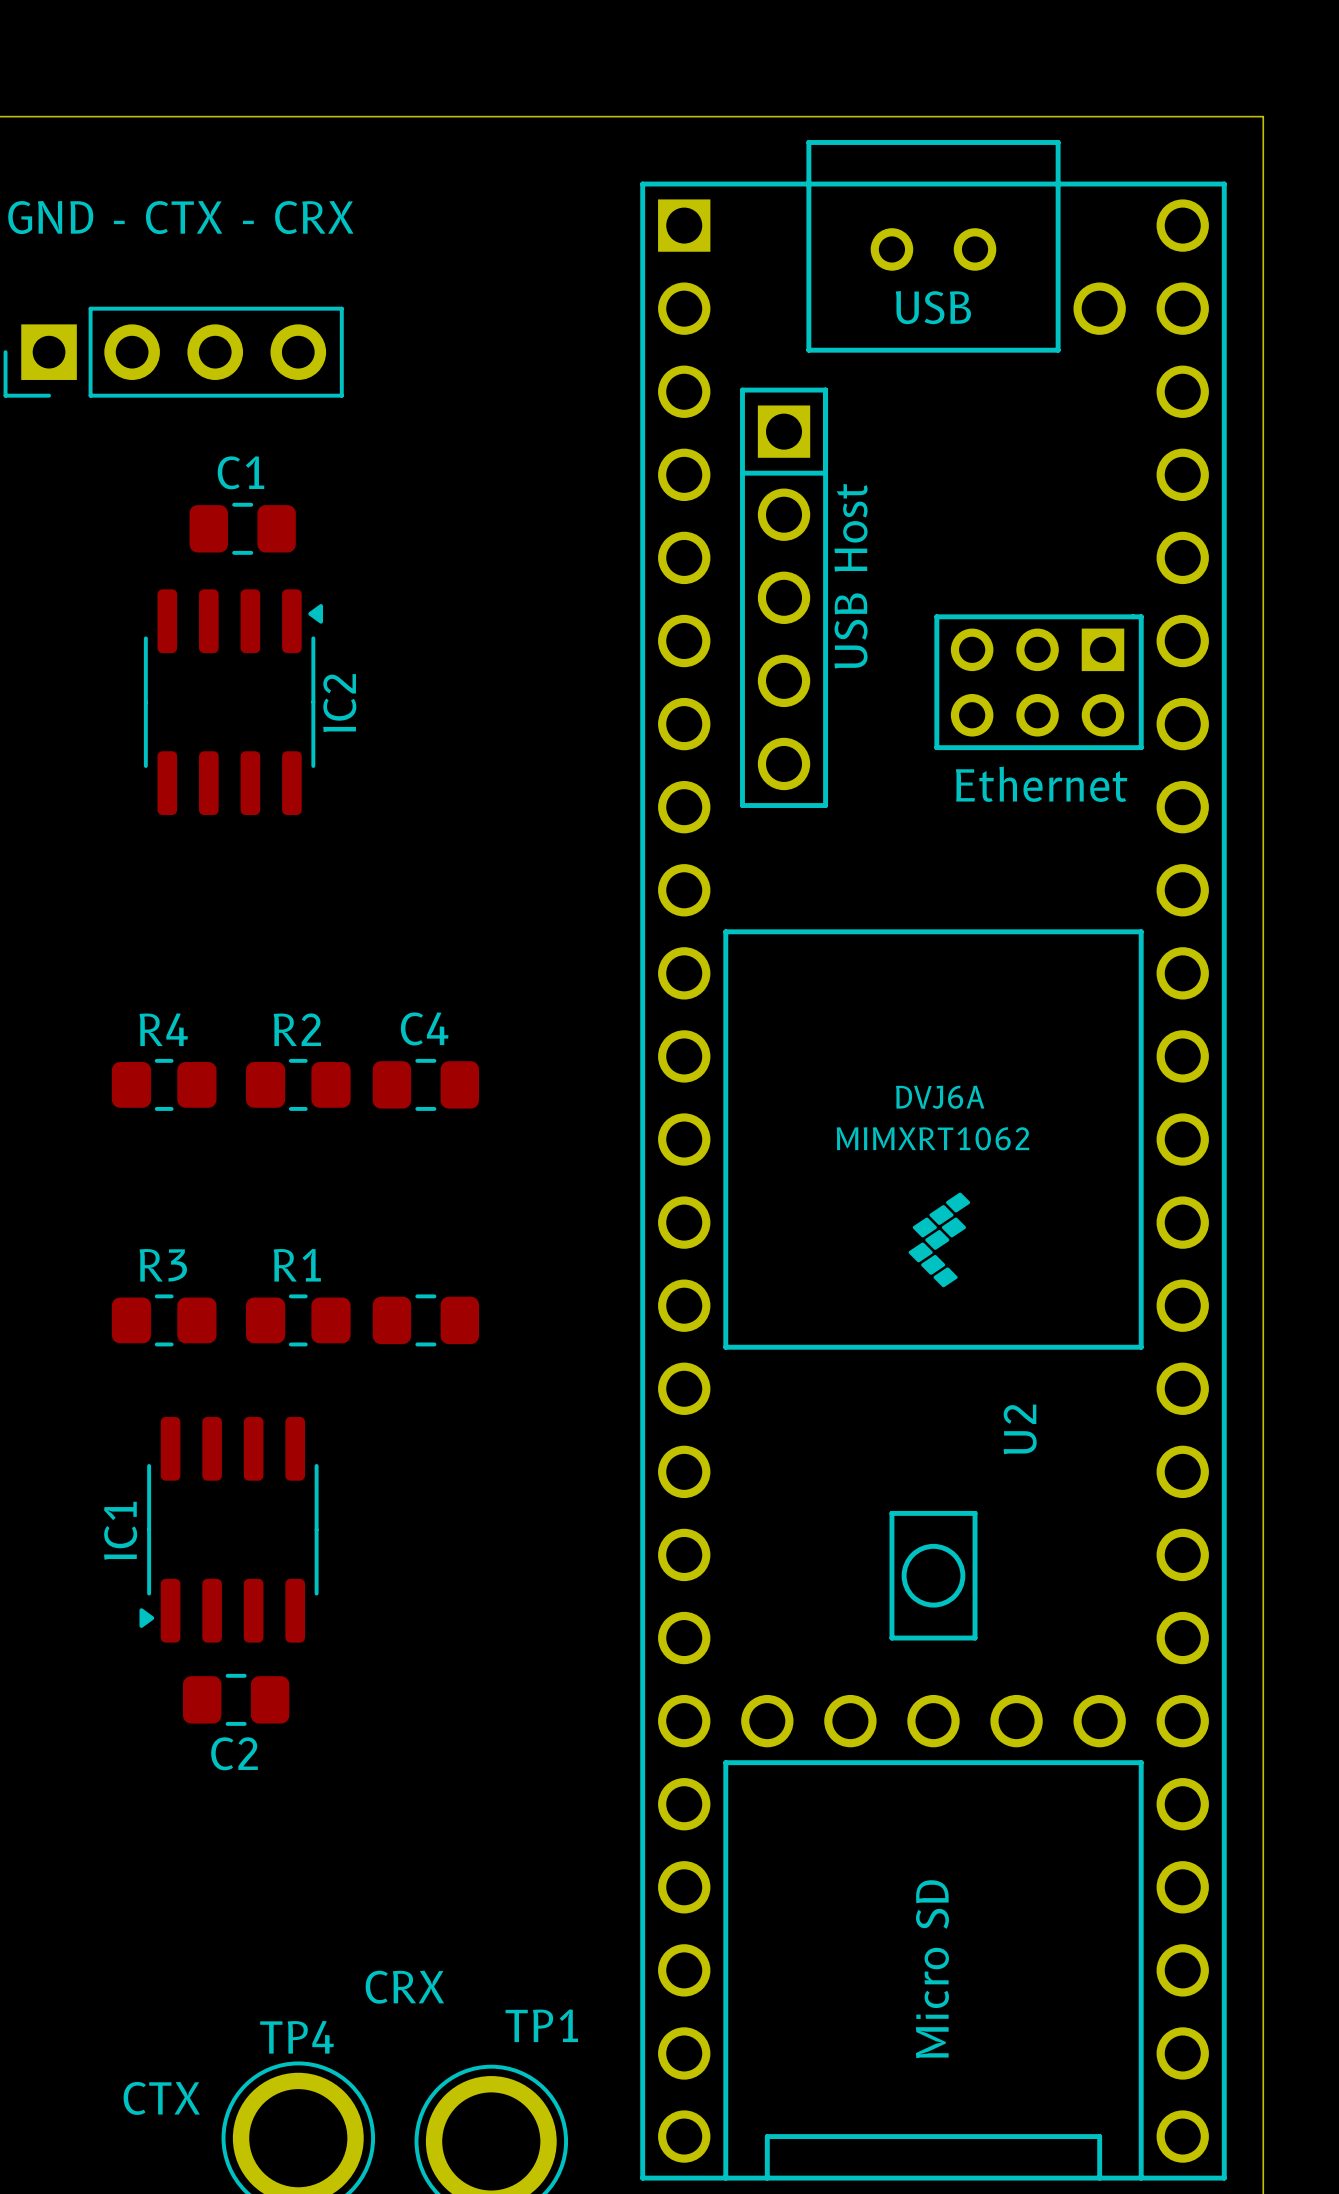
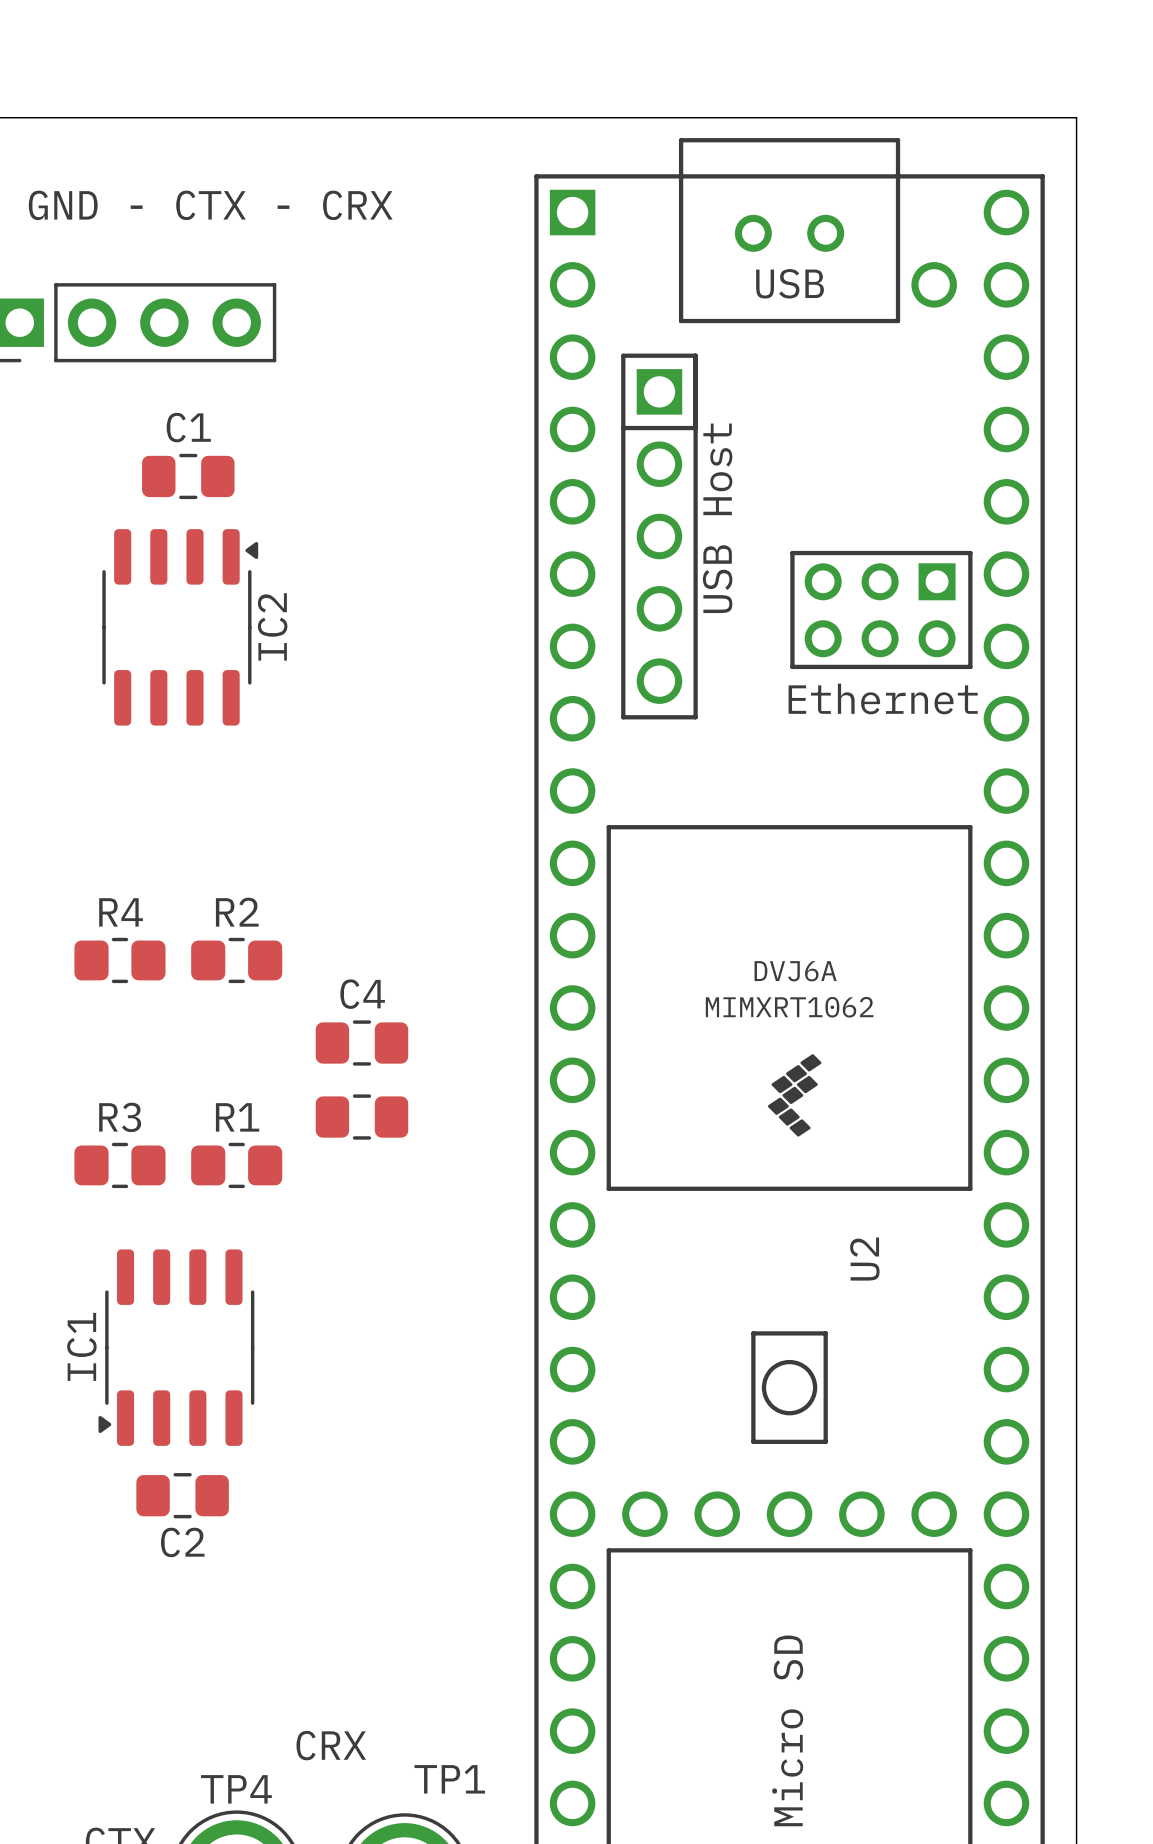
C4 position: (425, 1084) -> (361, 1043)
part position: (425, 1320) -> (361, 1117)

